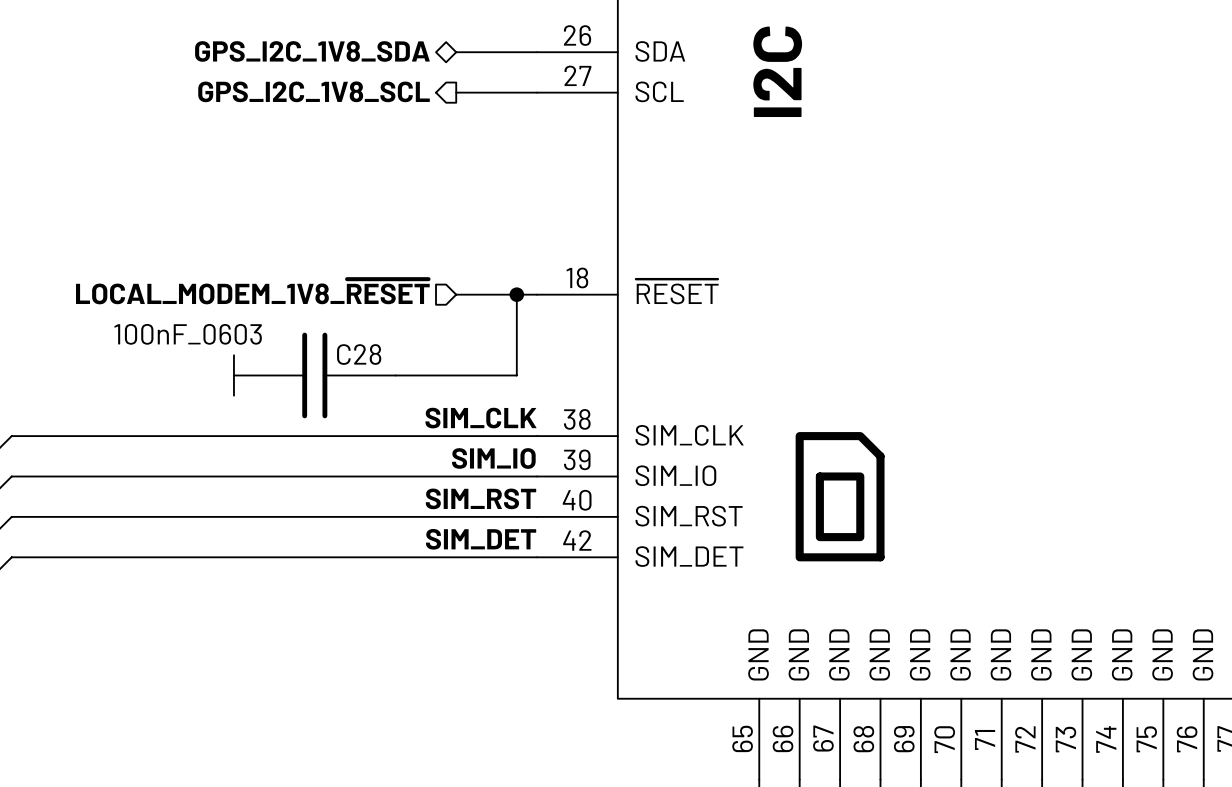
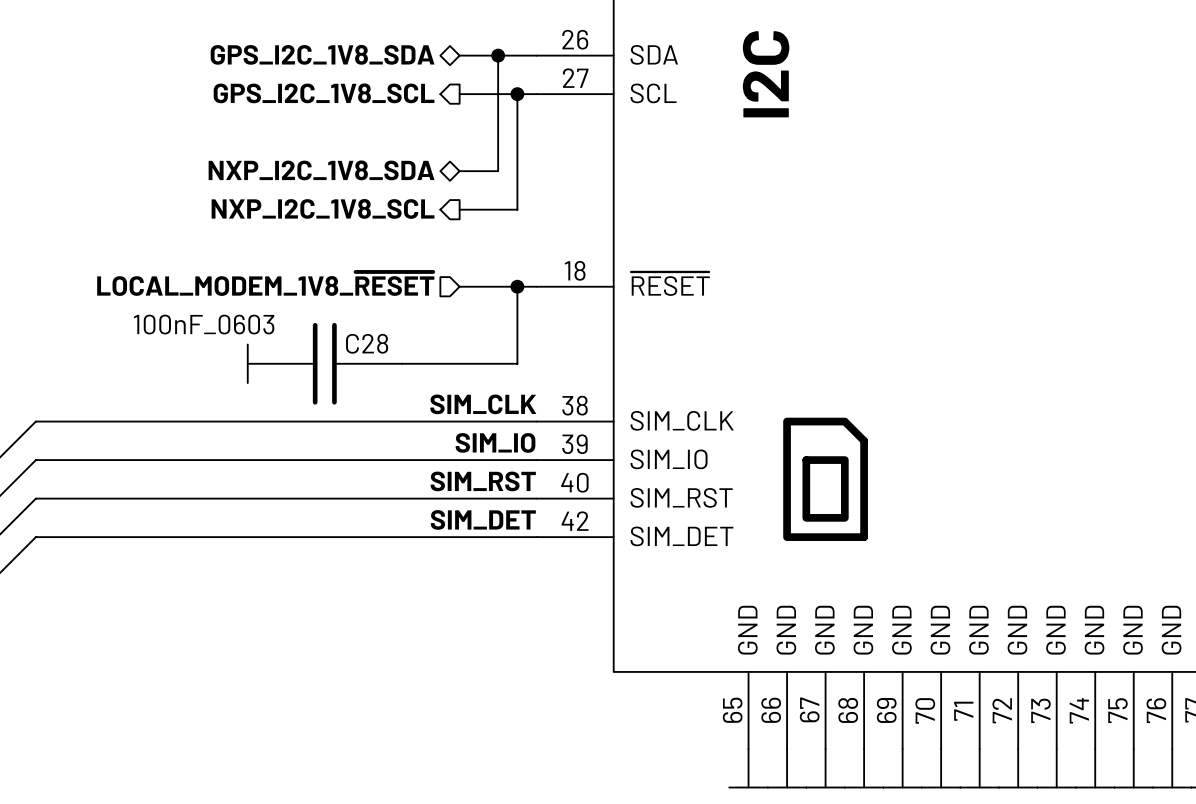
wire: none -> (498, 55) (498, 171) (459, 171)
junction: none -> (498, 55)
wire: none -> (517, 94) (517, 209) (459, 209)
junction: none -> (517, 94)
hierarchical label: none -> NXP_I2C_1V8_SDA (321, 170)
hierarchical label: none -> NXP_I2C_1V8_SCL (323, 208)

